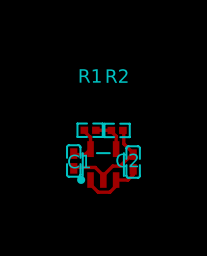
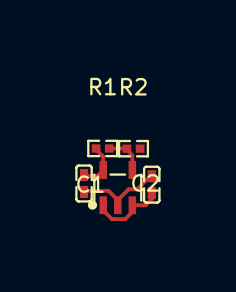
top track: (122, 130) (123, 143) (133, 154) -> none

